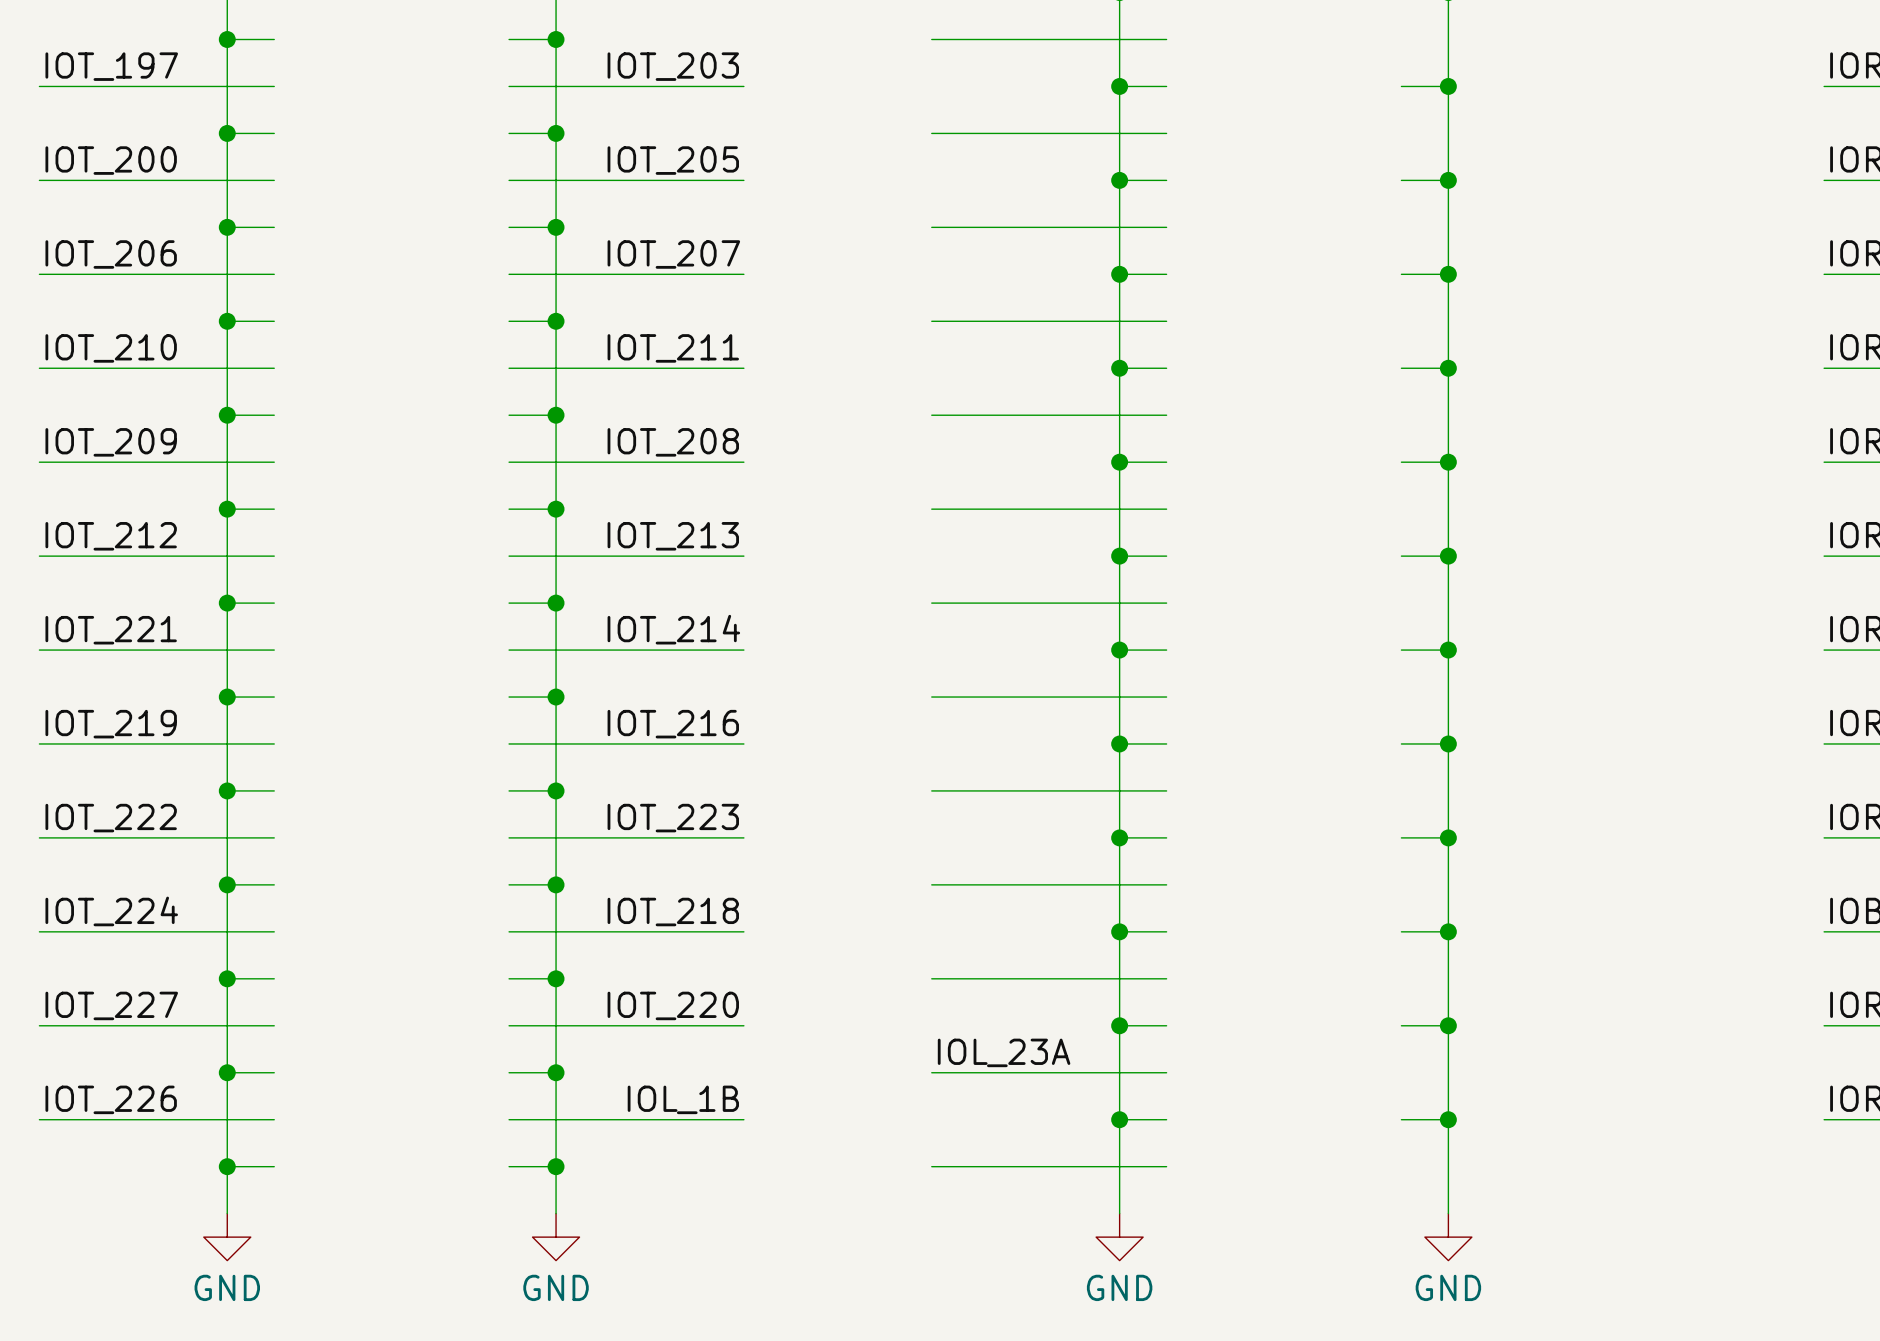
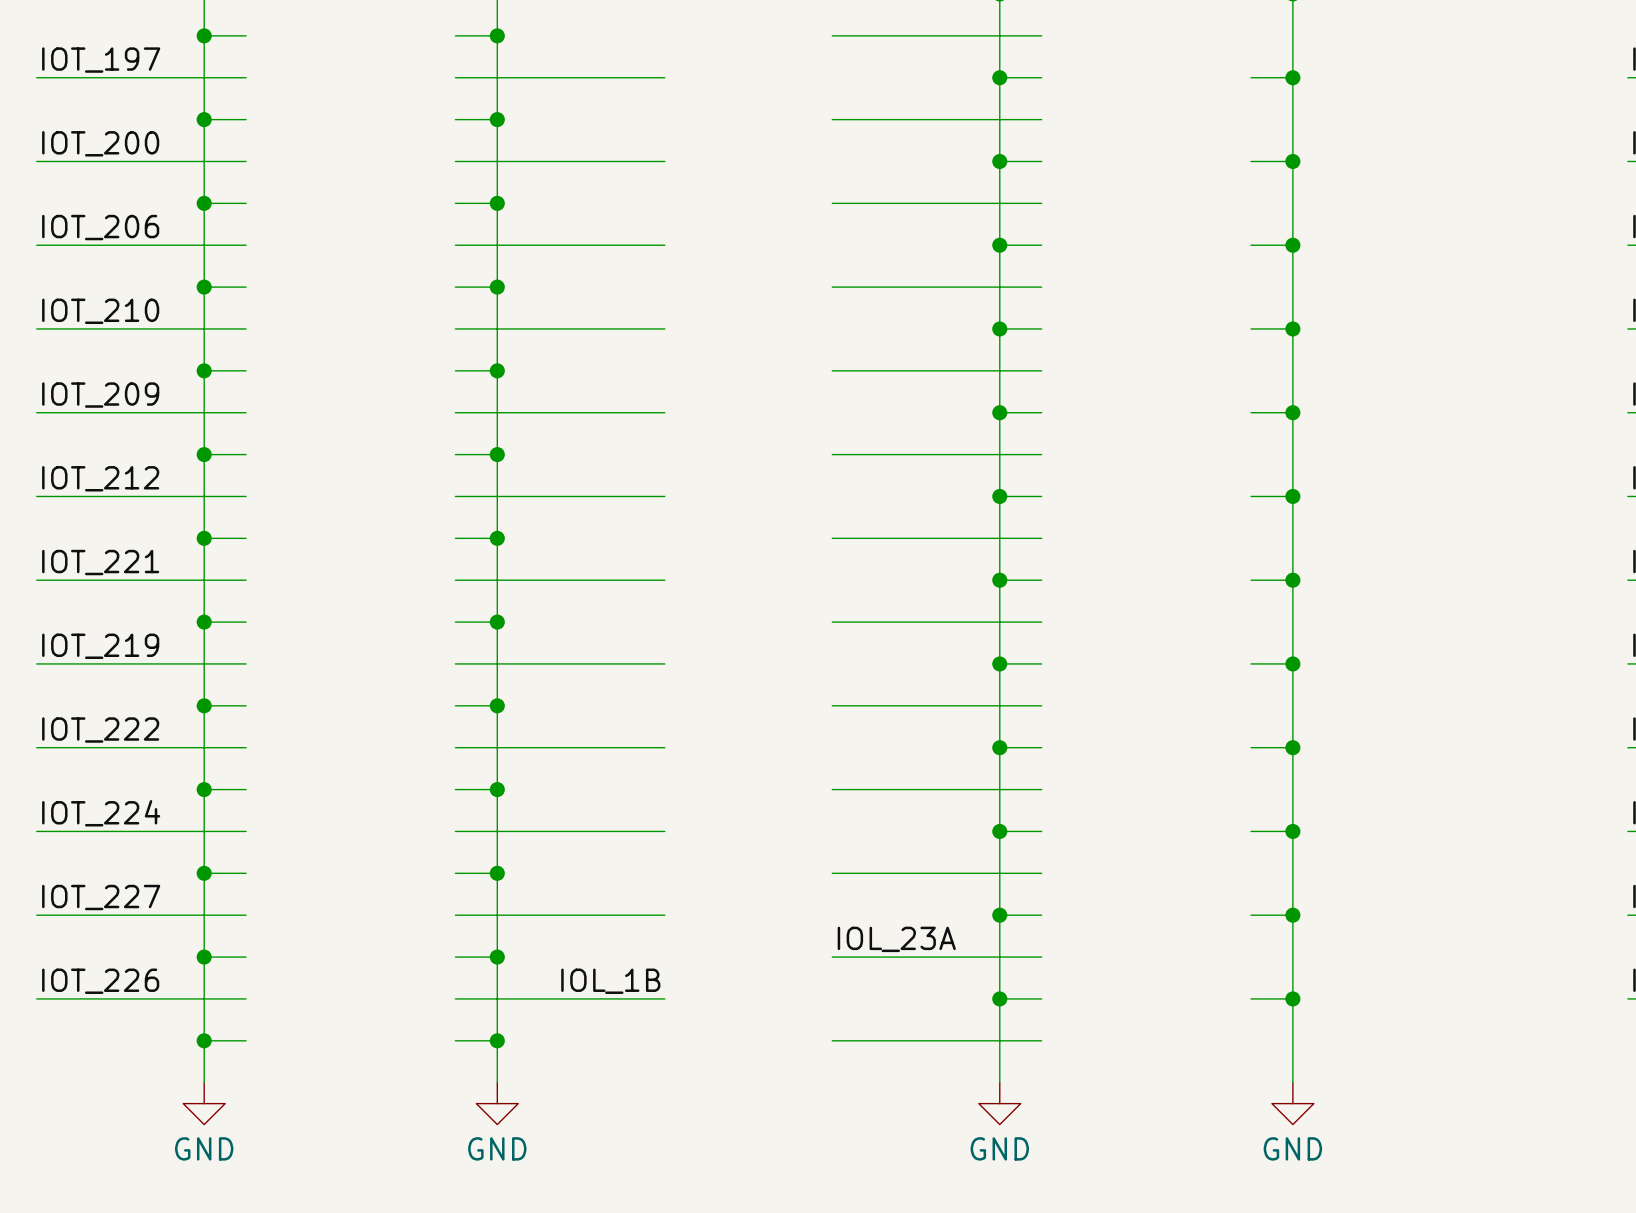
label: IOT_203 (673, 66) -> none
label: IOT_205 (673, 160) -> none
label: IOT_207 (673, 254) -> none
label: IOT_211 (673, 348) -> none
label: IOT_208 (673, 442) -> none
label: IOT_213 (673, 536) -> none
label: IOT_214 (673, 629) -> none
label: IOT_216 (673, 724) -> none
label: IOT_223 (673, 818) -> none
label: IOT_218 (673, 912) -> none
label: IOT_220 (673, 1005) -> none

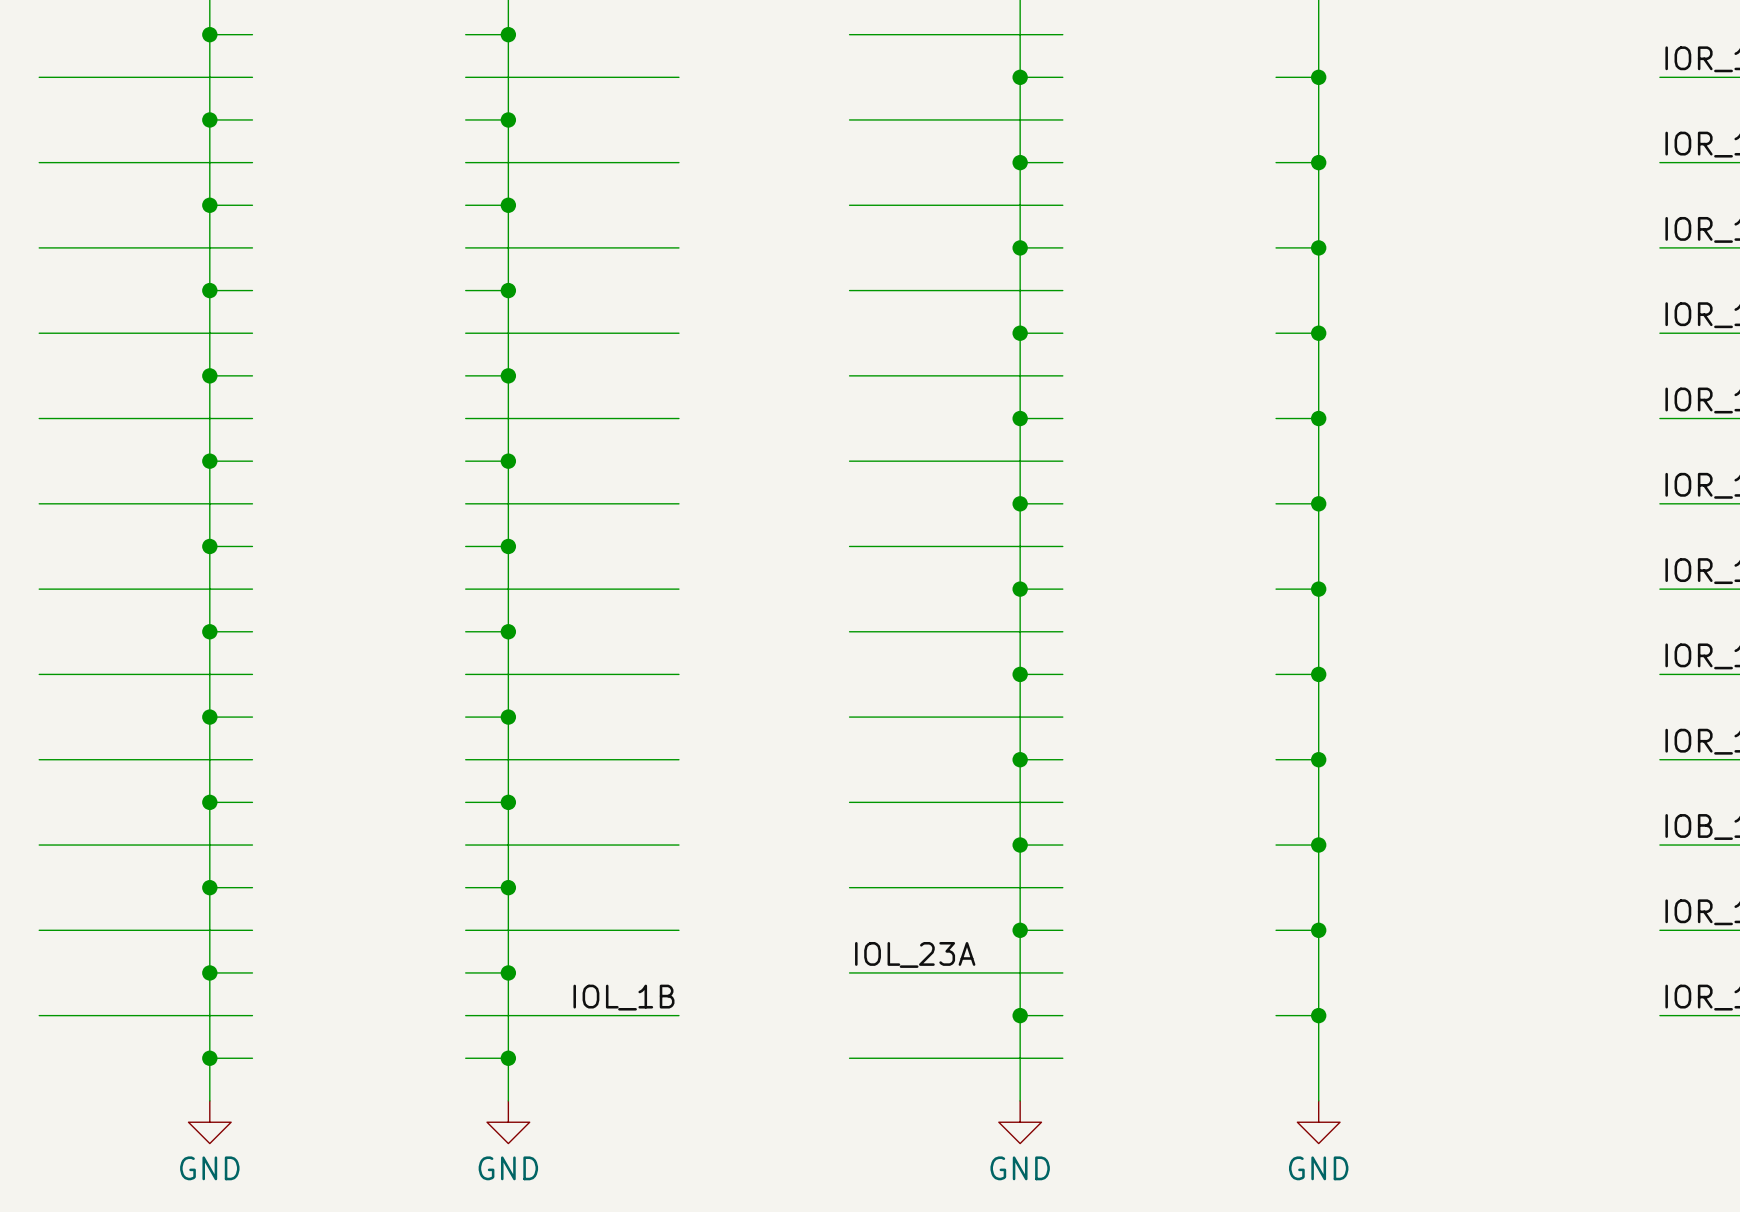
label: IOT_197 (101, 60) -> none
label: IOT_200 (100, 143) -> none
label: IOT_206 (100, 227) -> none
label: IOT_210 (100, 311) -> none
label: IOT_209 (100, 395) -> none
label: IOT_212 (100, 478) -> none
label: IOT_221 (100, 562) -> none
label: IOT_219 (100, 646) -> none
label: IOT_222 (100, 730) -> none
label: IOT_224 (101, 813) -> none
label: IOT_227 (101, 897) -> none
label: IOT_226 (100, 981) -> none

